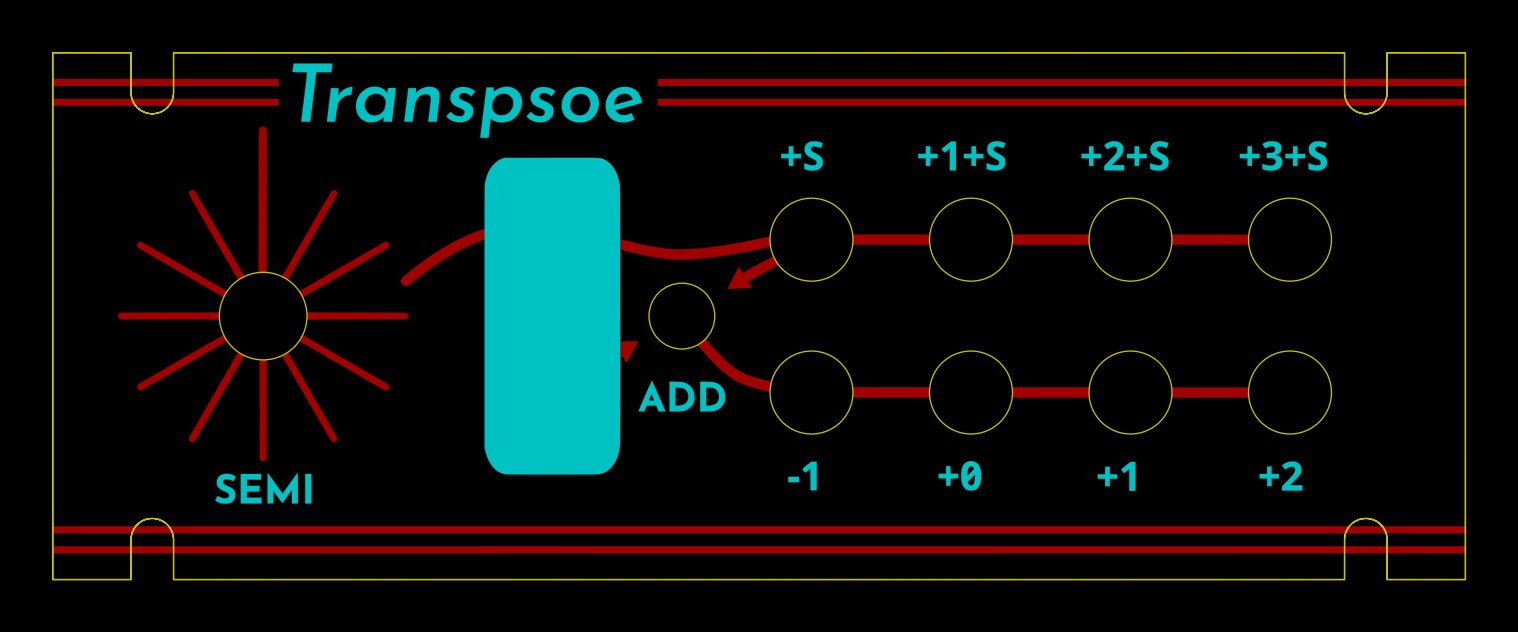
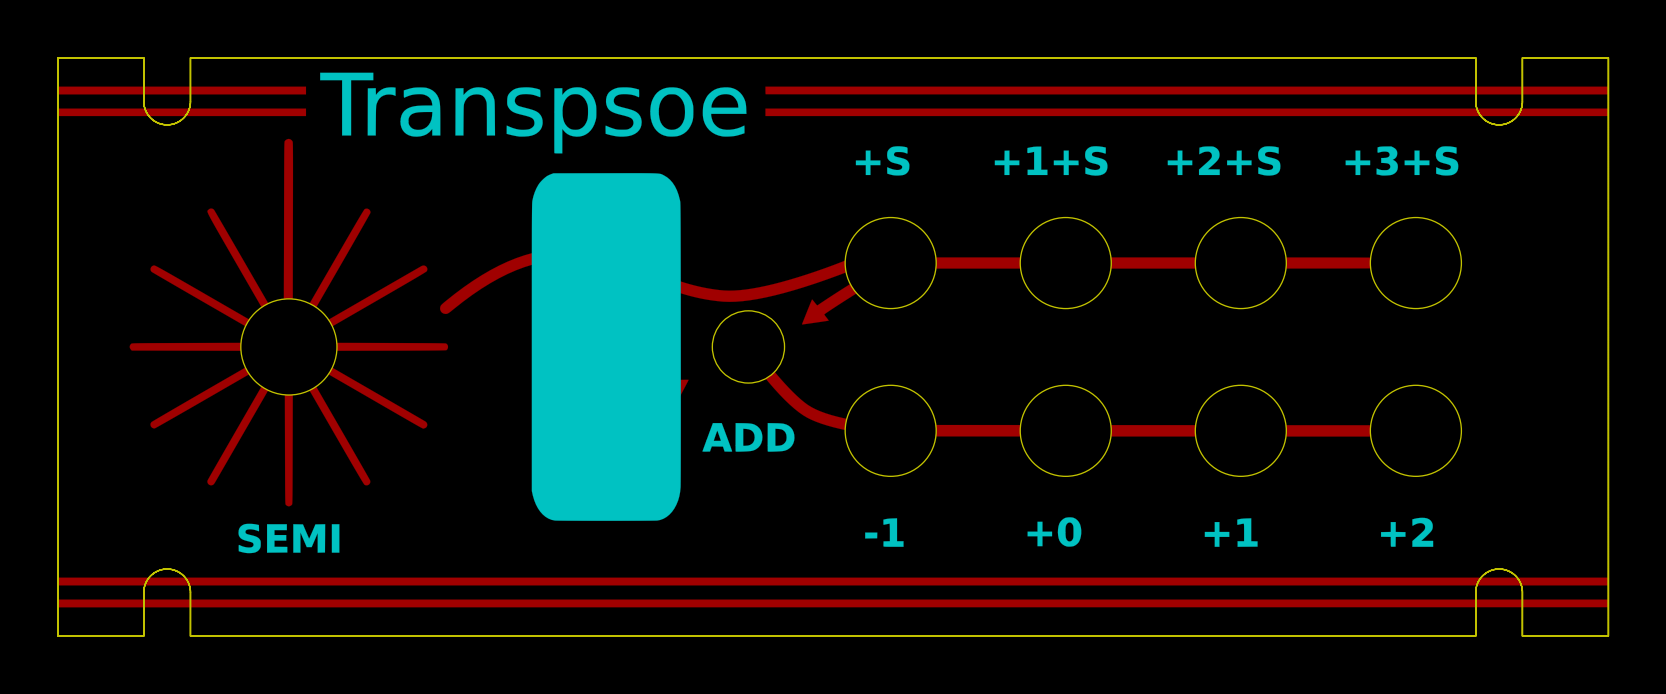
drawing shape: [215, 63, 1328, 504] -> [238, 72, 1459, 554]
drawing shape: [52, 78, 1466, 554] -> [57, 86, 1609, 608]

